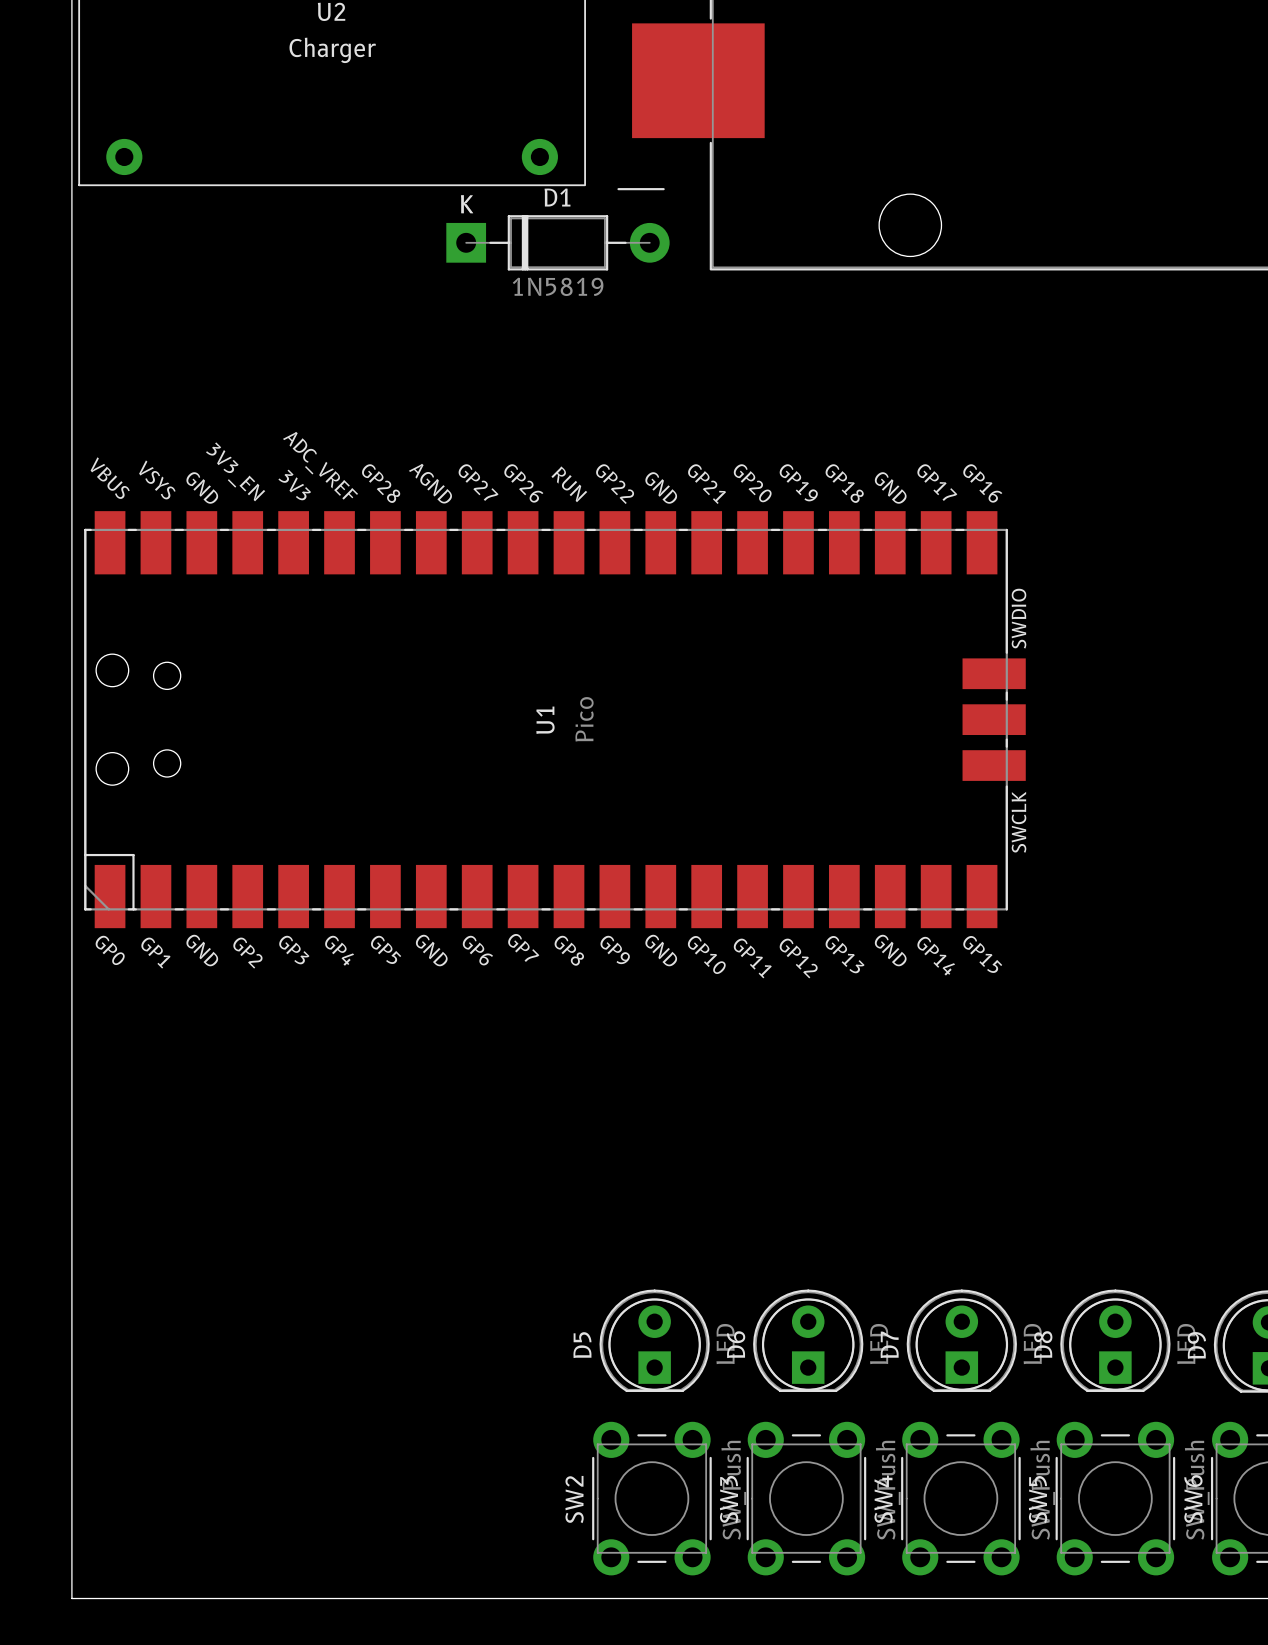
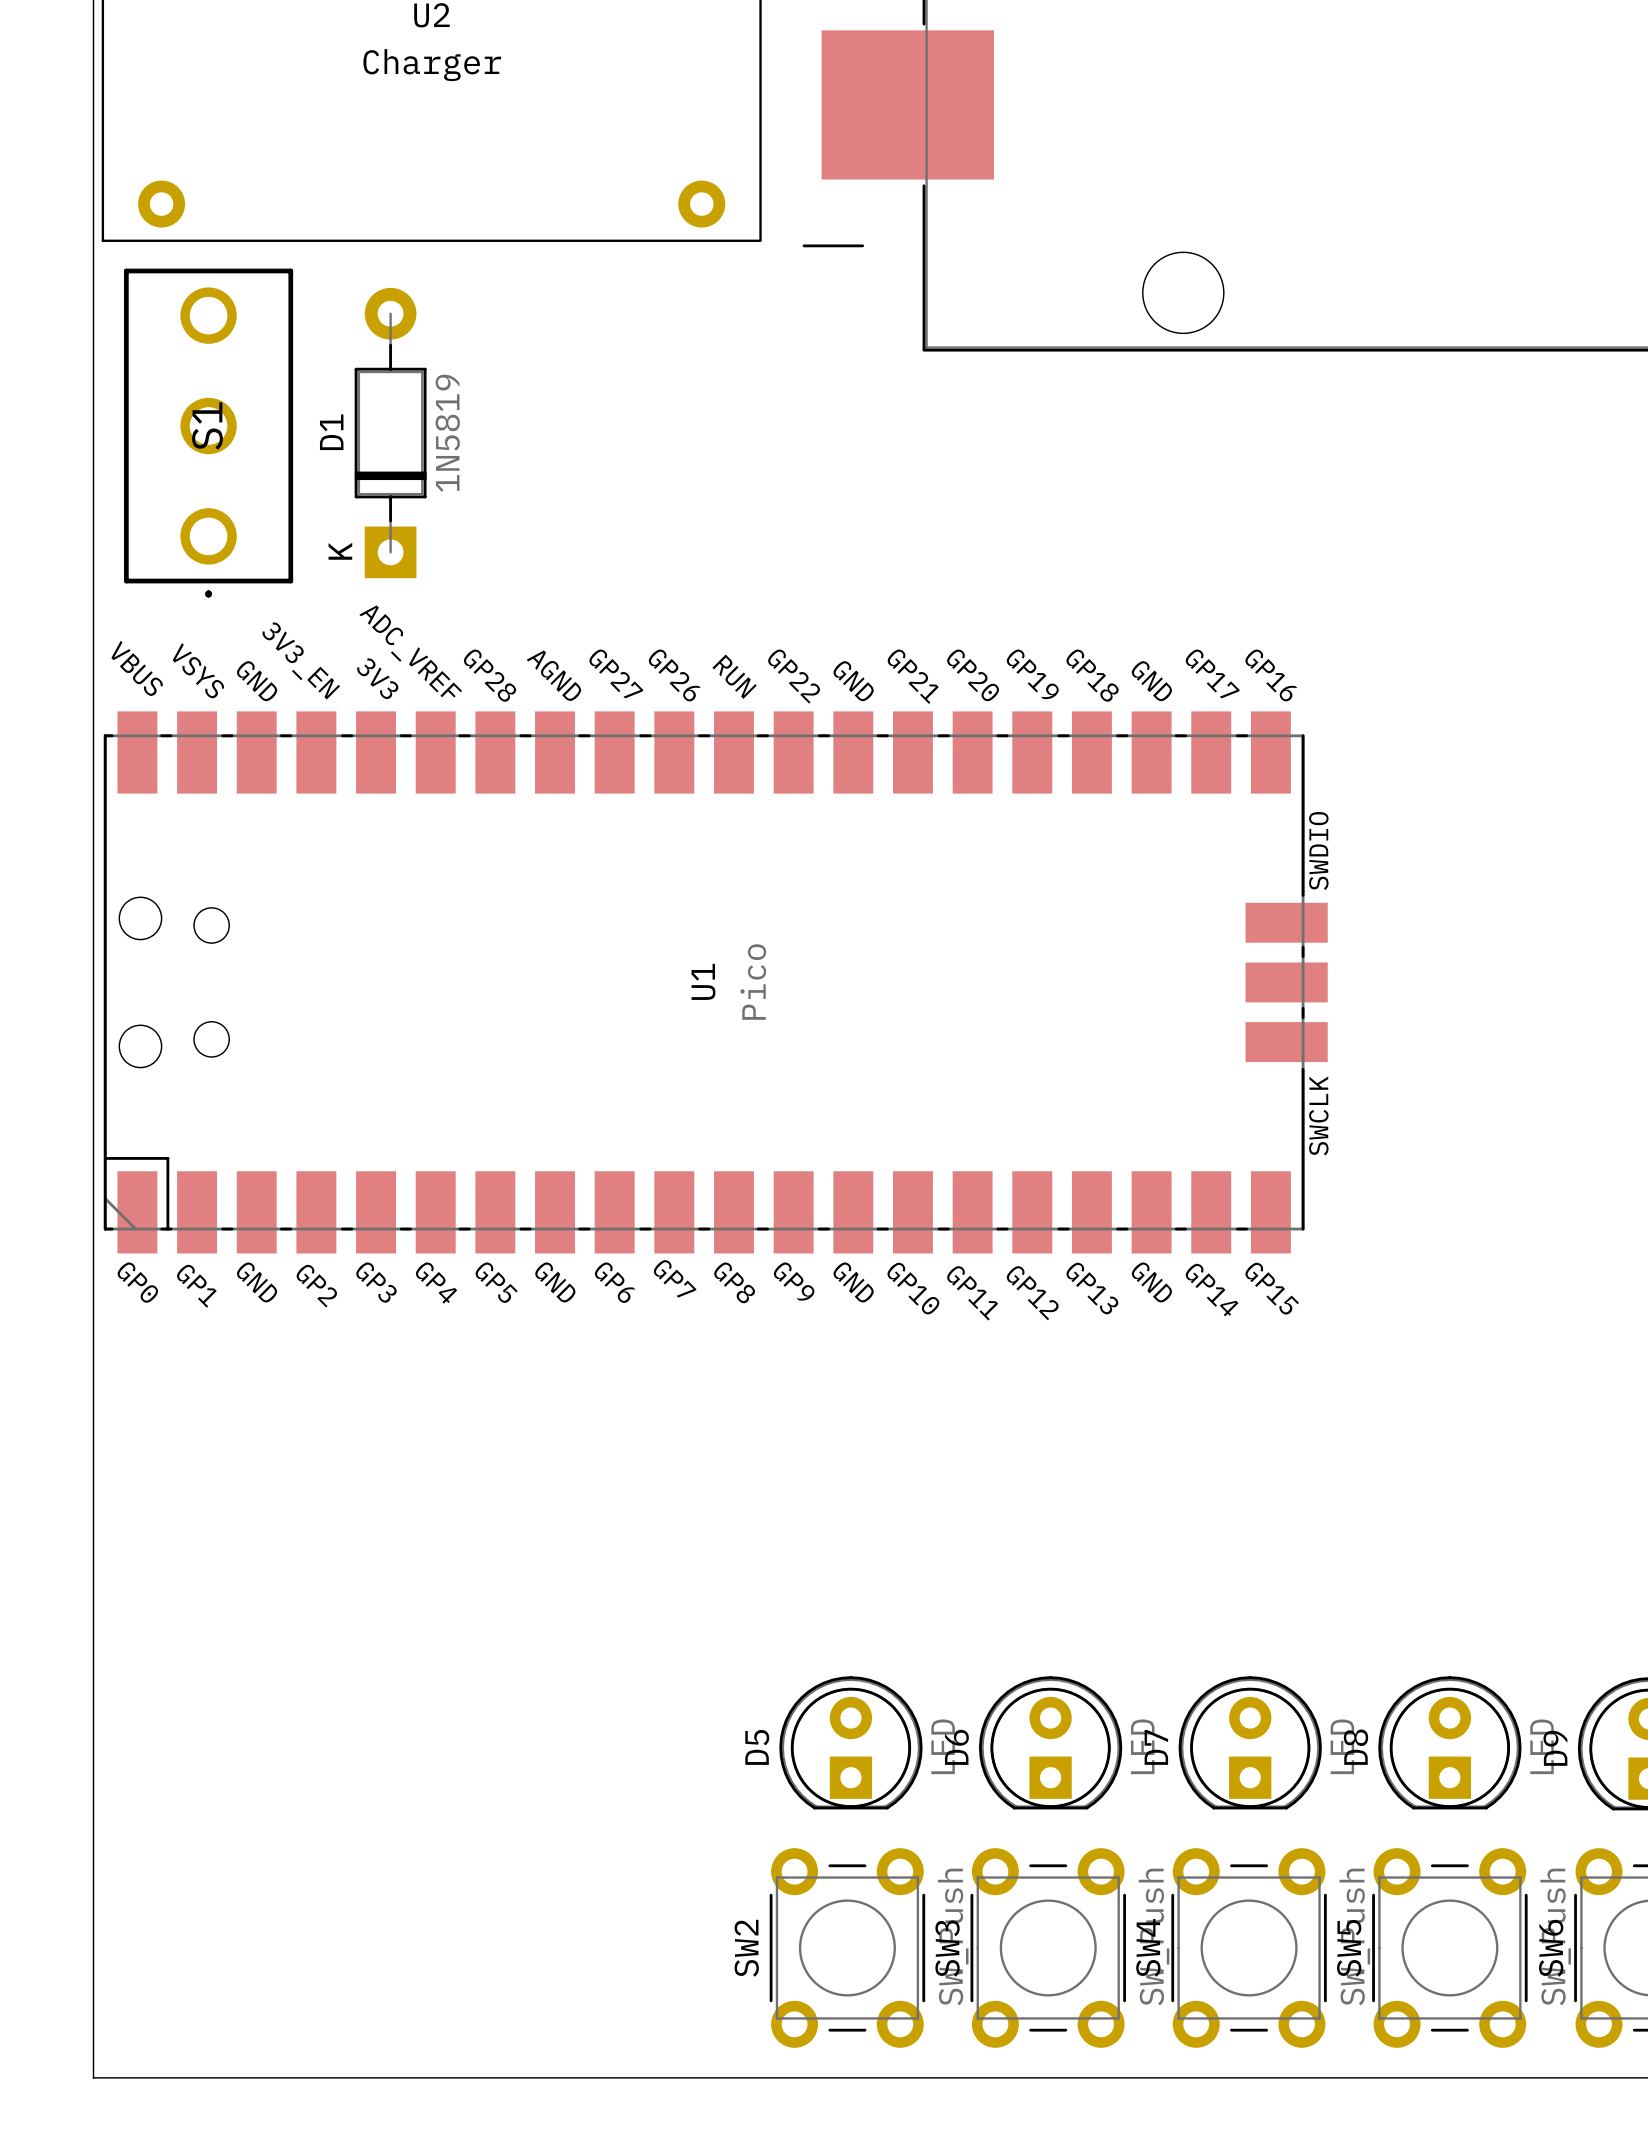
D1 rotation: 0° (557, 242) -> 90° counterclockwise (390, 433)
D1 position: (557, 242) -> (390, 433)
S1: none -> (208, 433)
U1 position: (554, 719) -> (715, 982)

